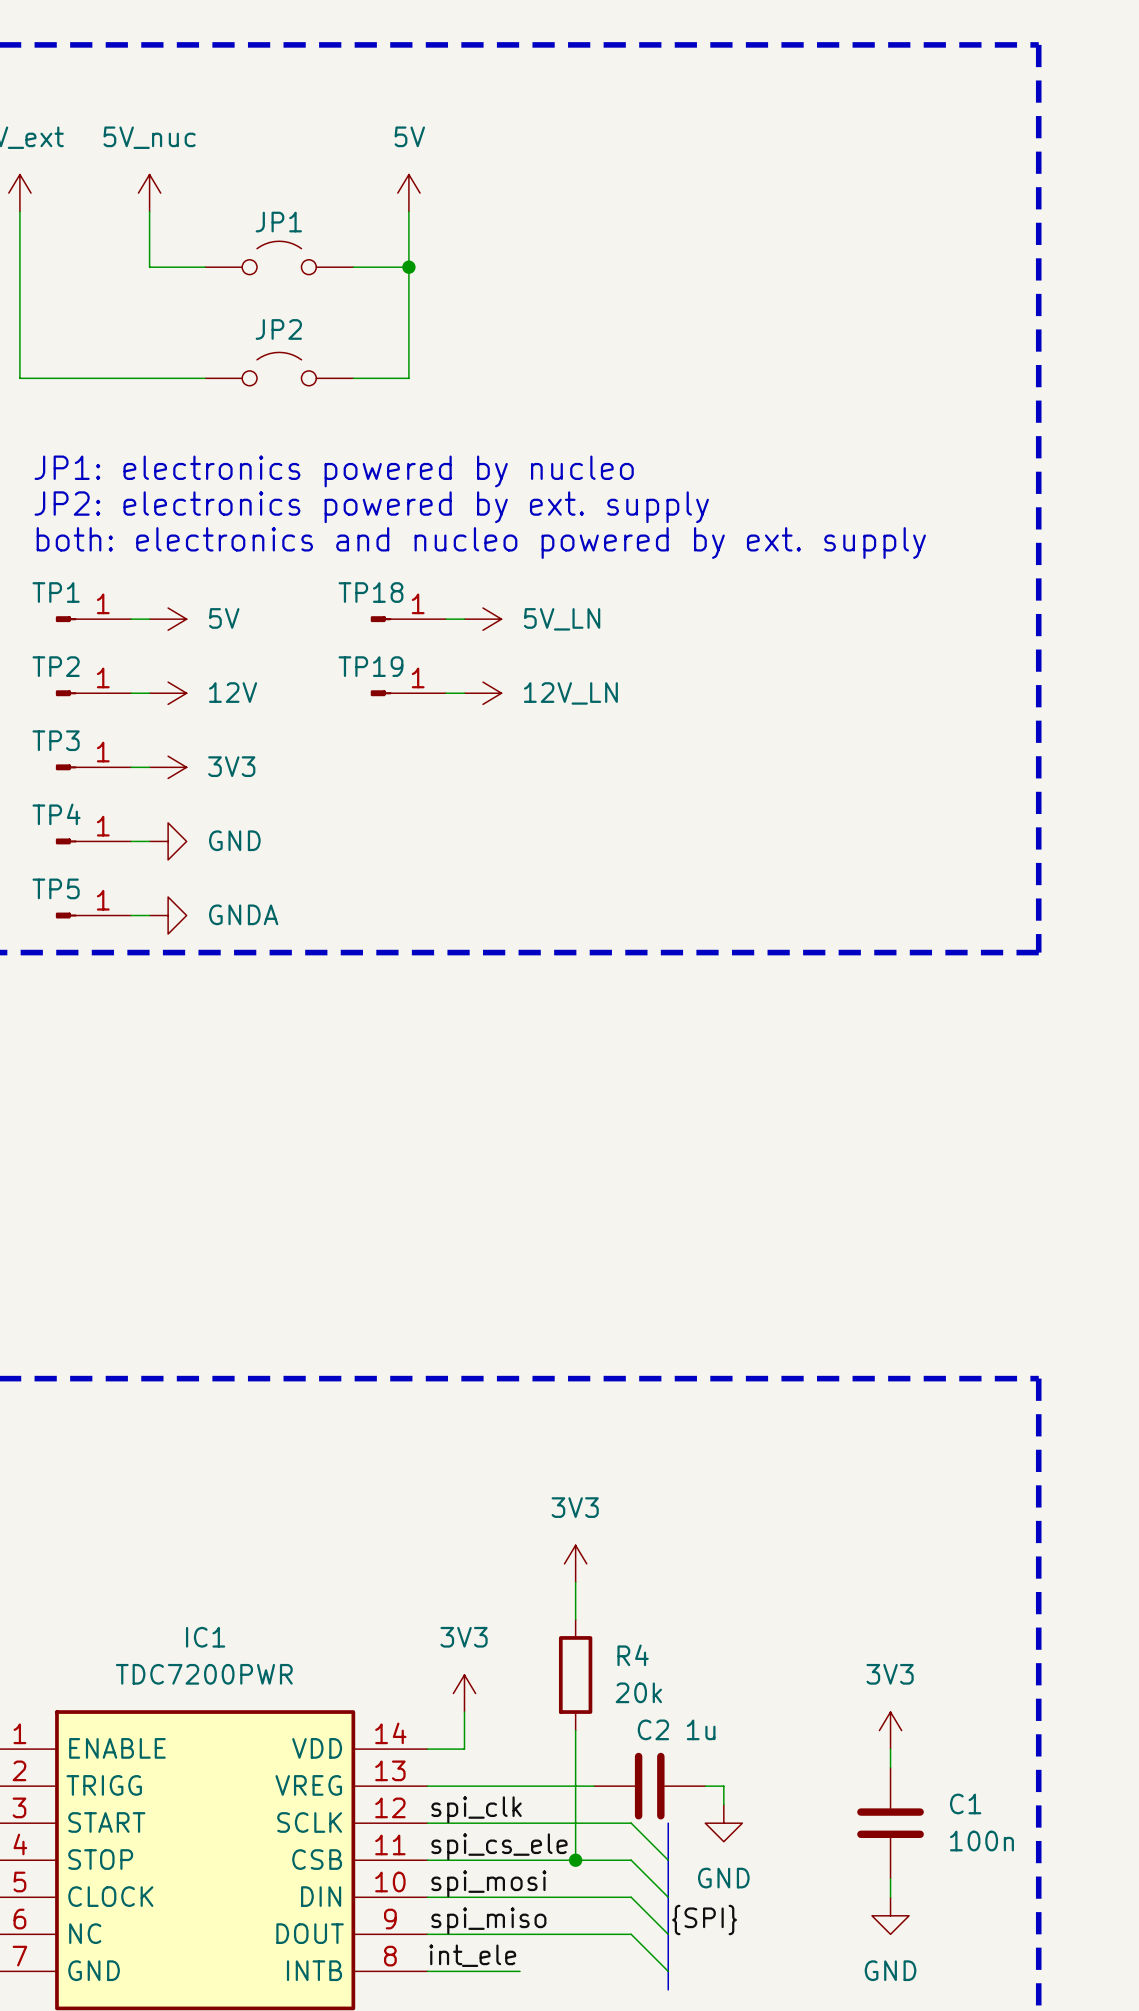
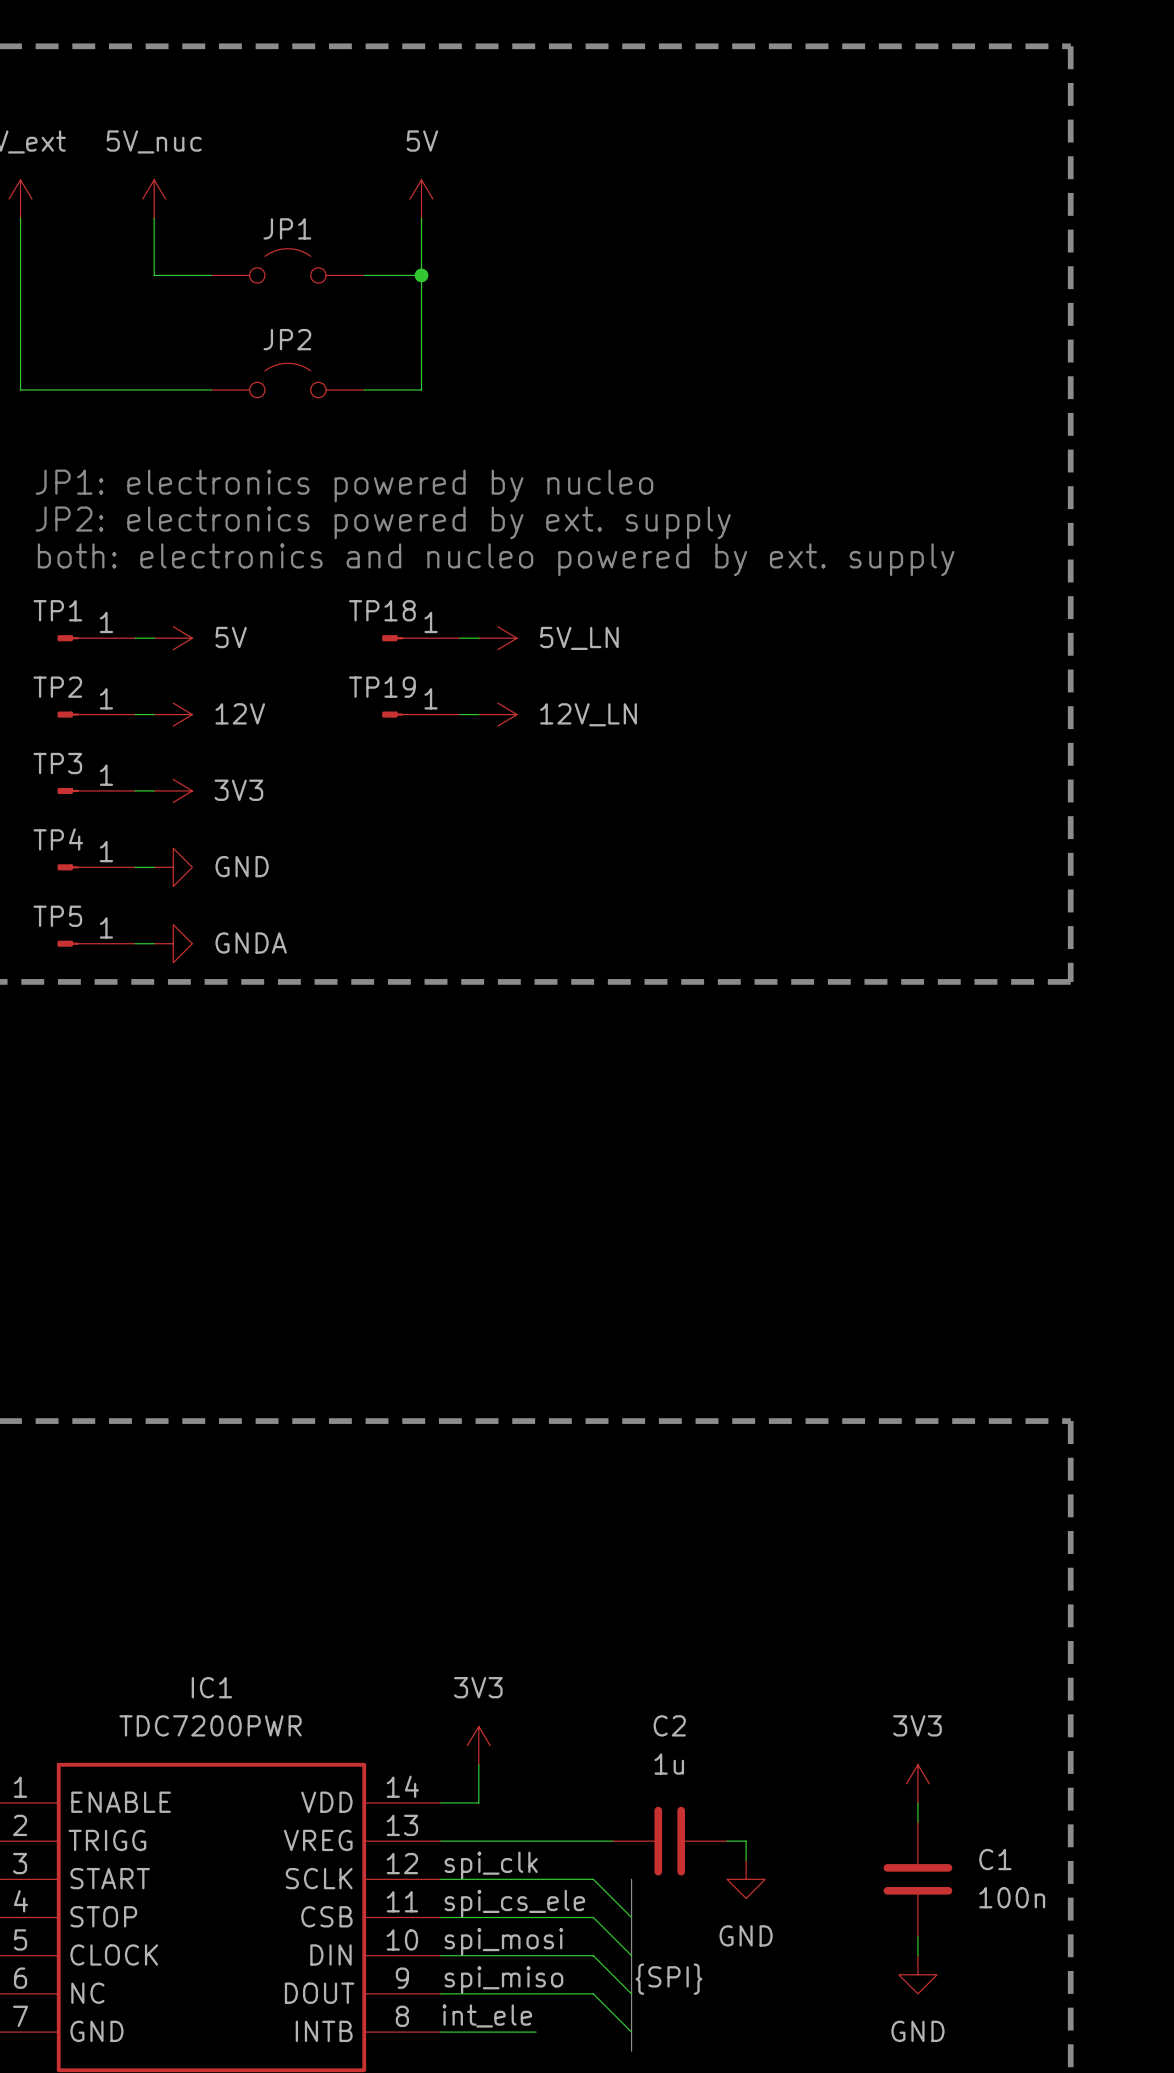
power symbol: 3V3 (575, 1563) -> none
wire: (575, 1582) (575, 1619) -> none
R4: 20k (575, 1674) -> none
C2 name position: C2 (653, 1729) -> C2 (669, 1725)
C2 value position: 1u (701, 1729) -> 1u (669, 1764)
wire: (575, 1730) (575, 1860) (631, 1860) (668, 1897) -> none
wire: (575, 1823) (631, 1823) (668, 1860) -> (593, 1879) (631, 1917)
bus: (668, 1823) (668, 1989) -> (631, 1879) (631, 2051)
wire: none -> (593, 1917) (631, 1955)
junction: (575, 1860) -> none
wire: (575, 1897) (631, 1897) (668, 1934) -> (593, 1955) (631, 1993)
label position: {SPI} (704, 1920) -> {SPI} (668, 1979)
wire: (575, 1934) (631, 1934) (668, 1971) -> (593, 1993) (631, 2032)

